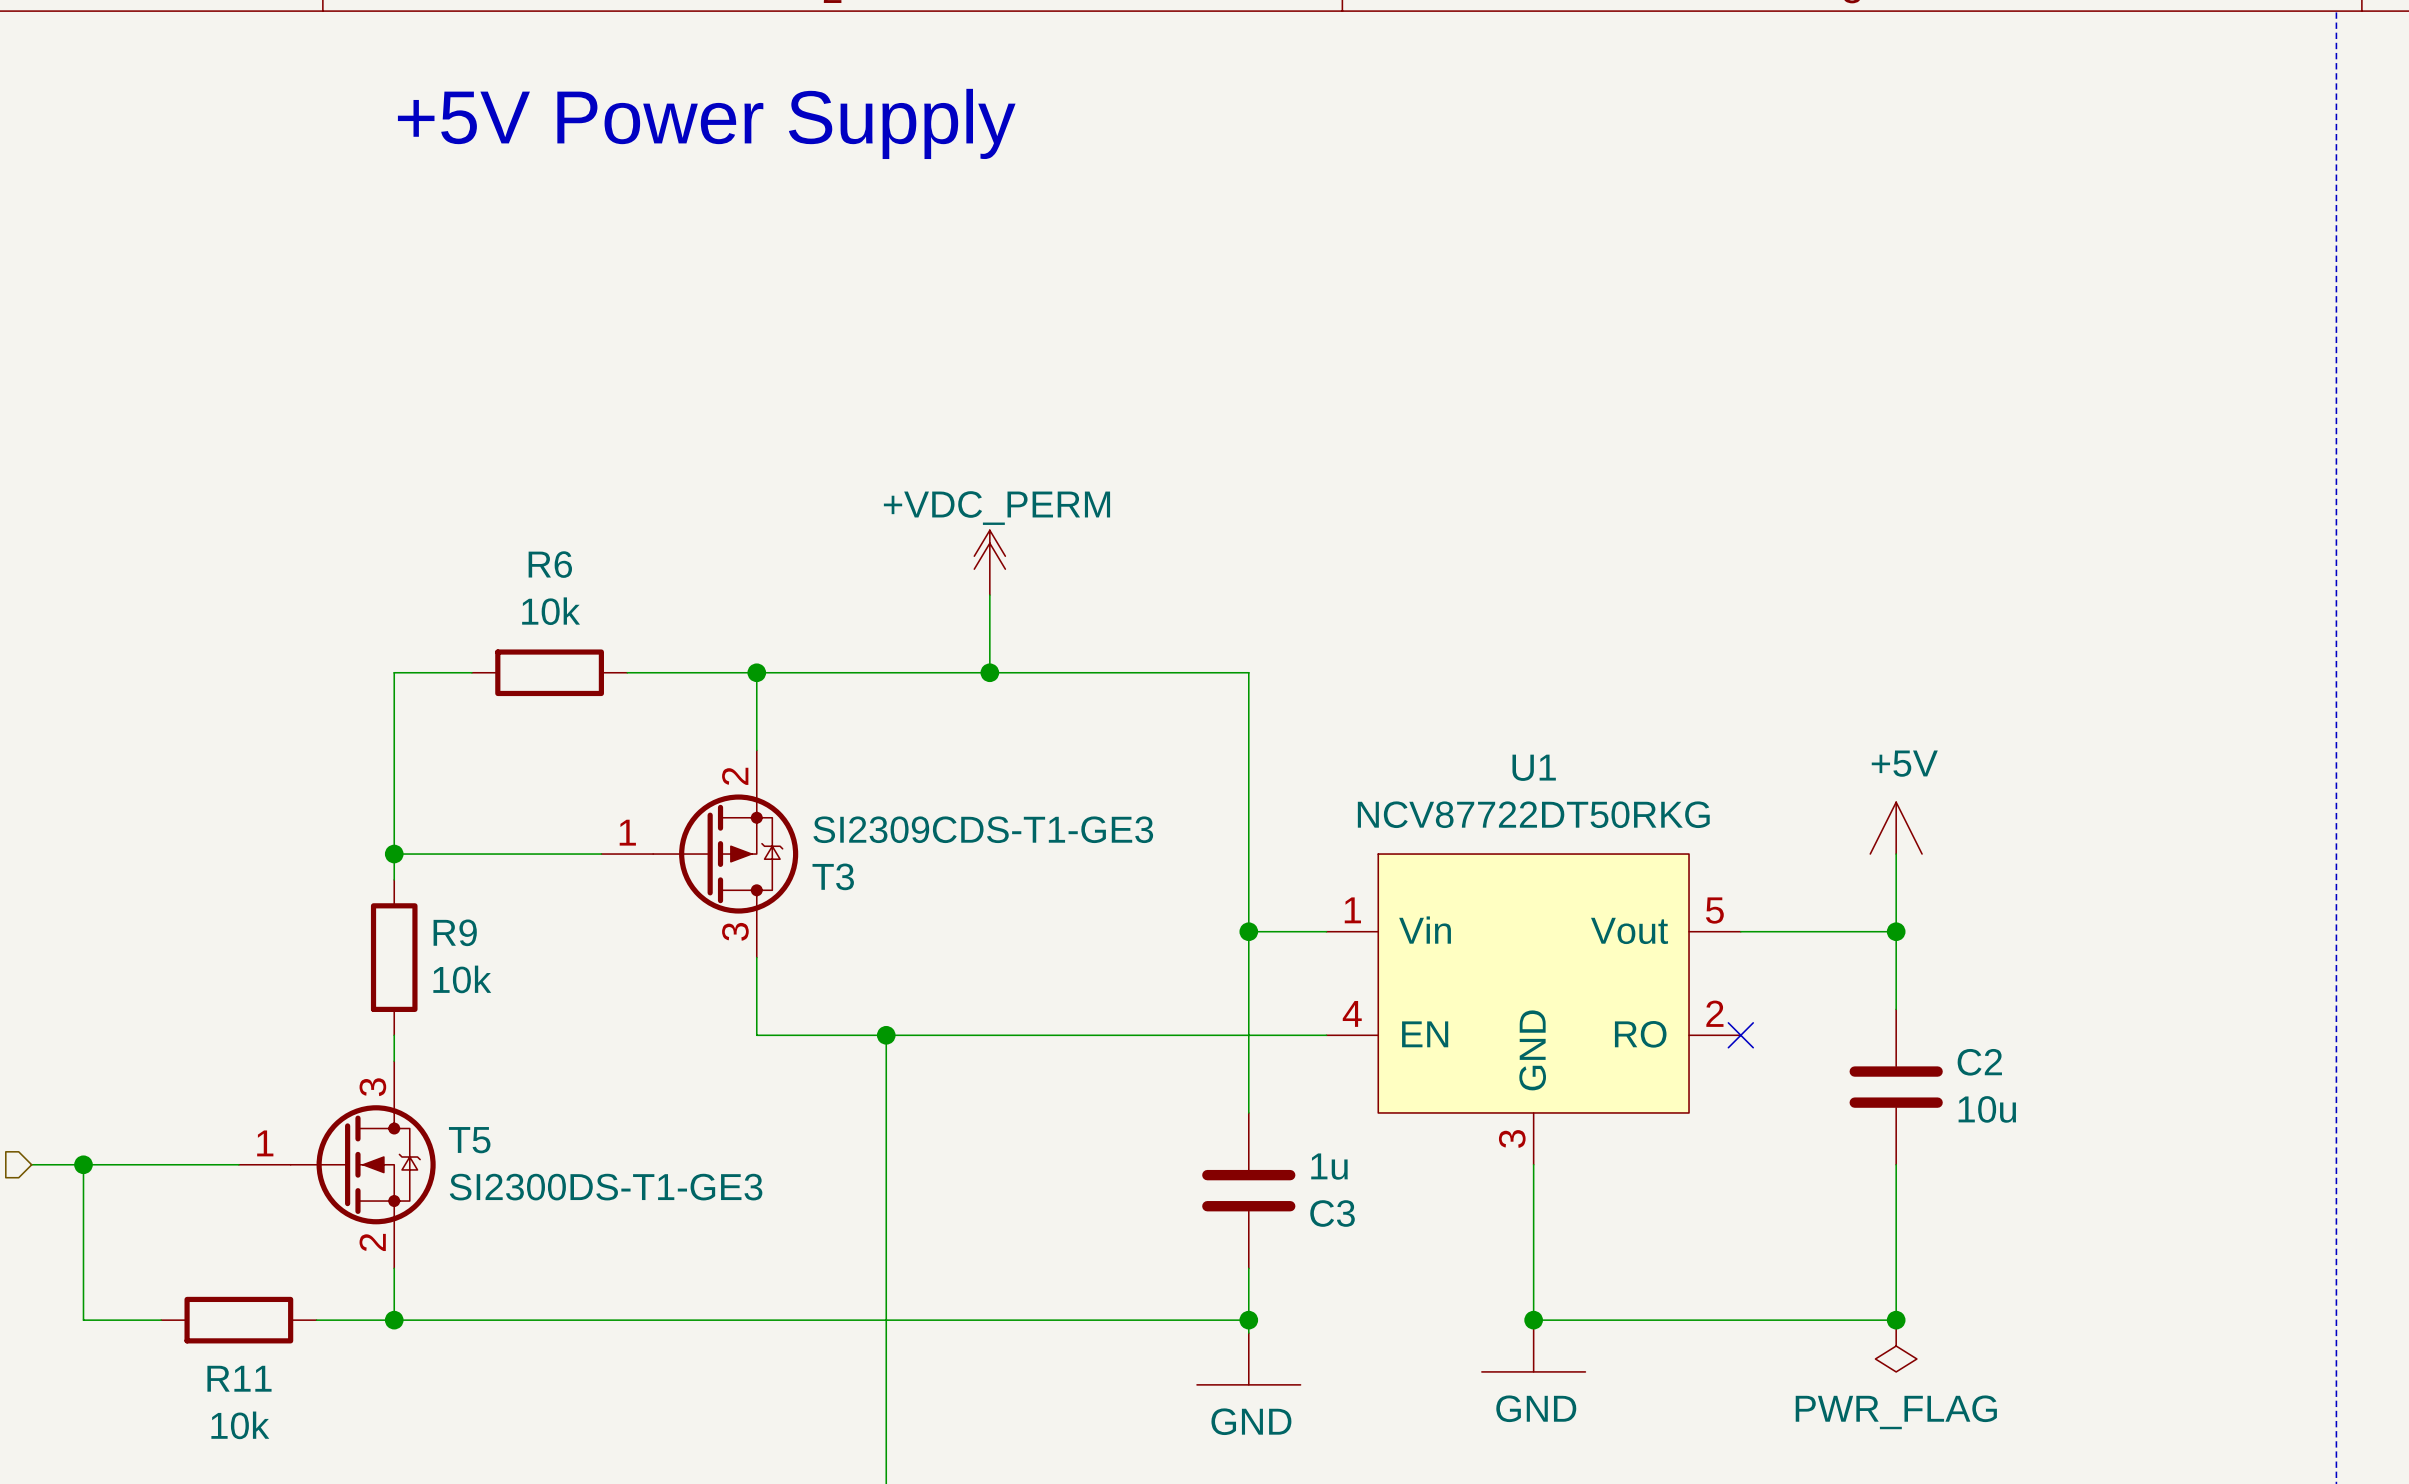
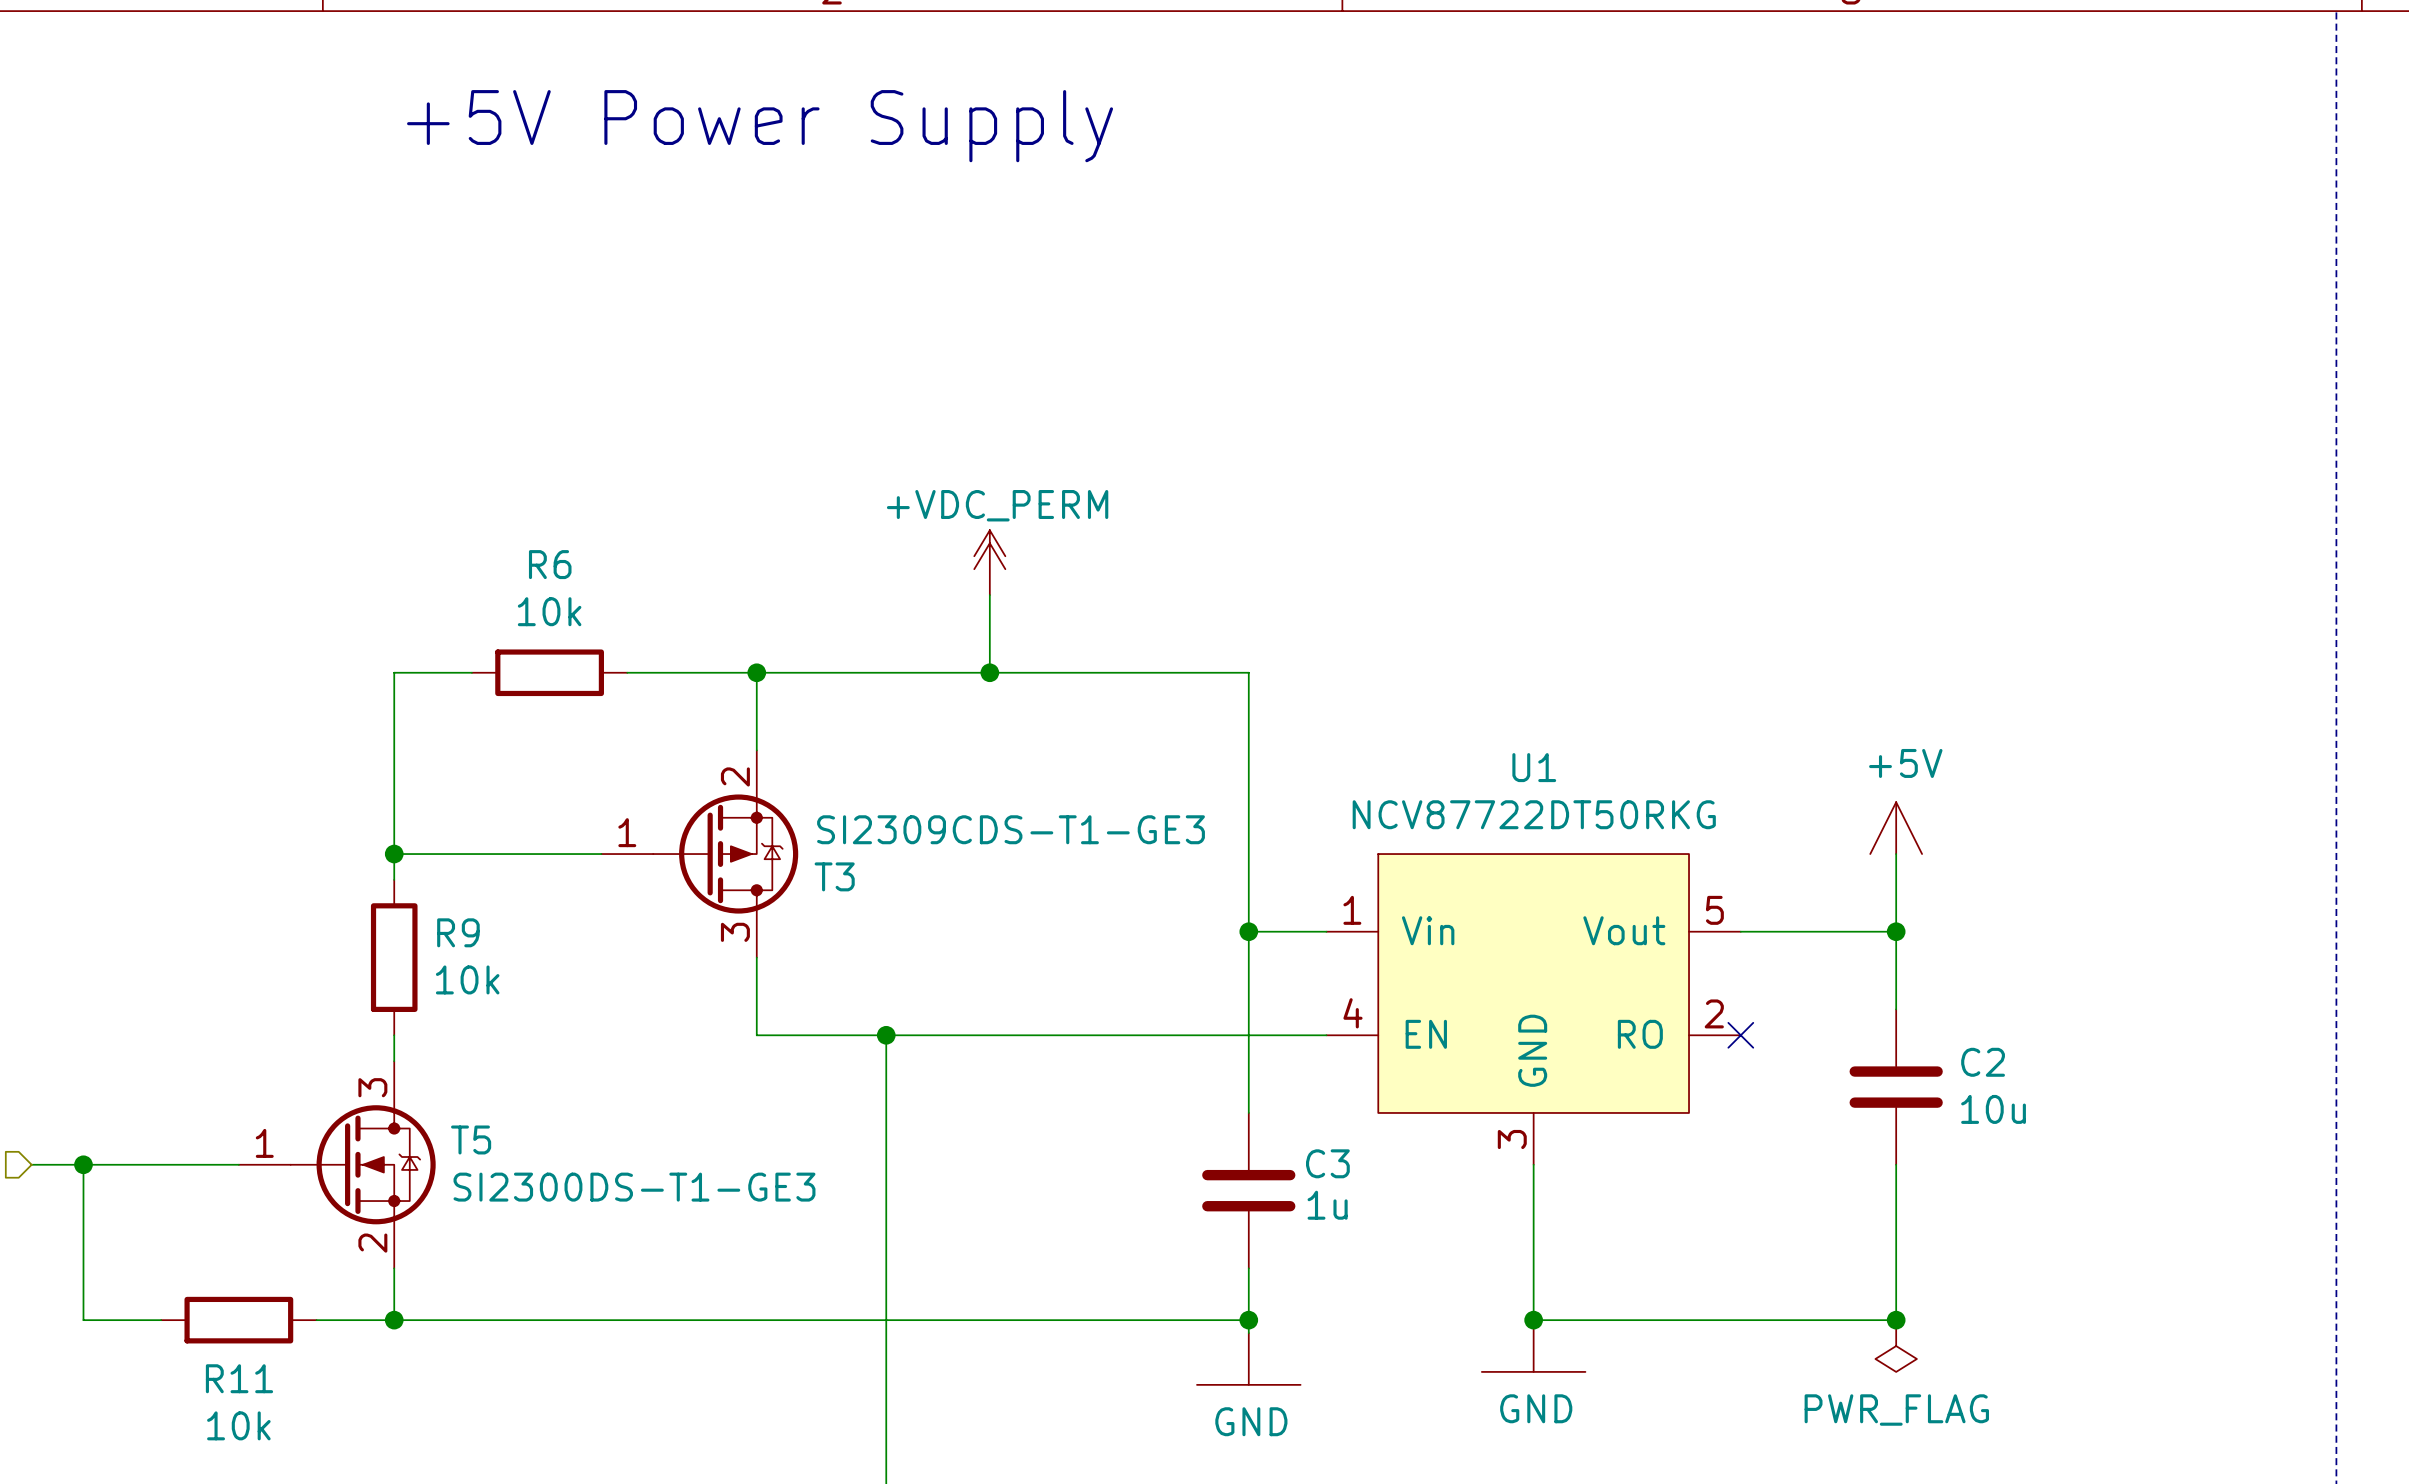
C3 value position: 1u (1329, 1166) -> 1u (1327, 1205)
C3 name position: C3 (1332, 1213) -> C3 (1327, 1163)

